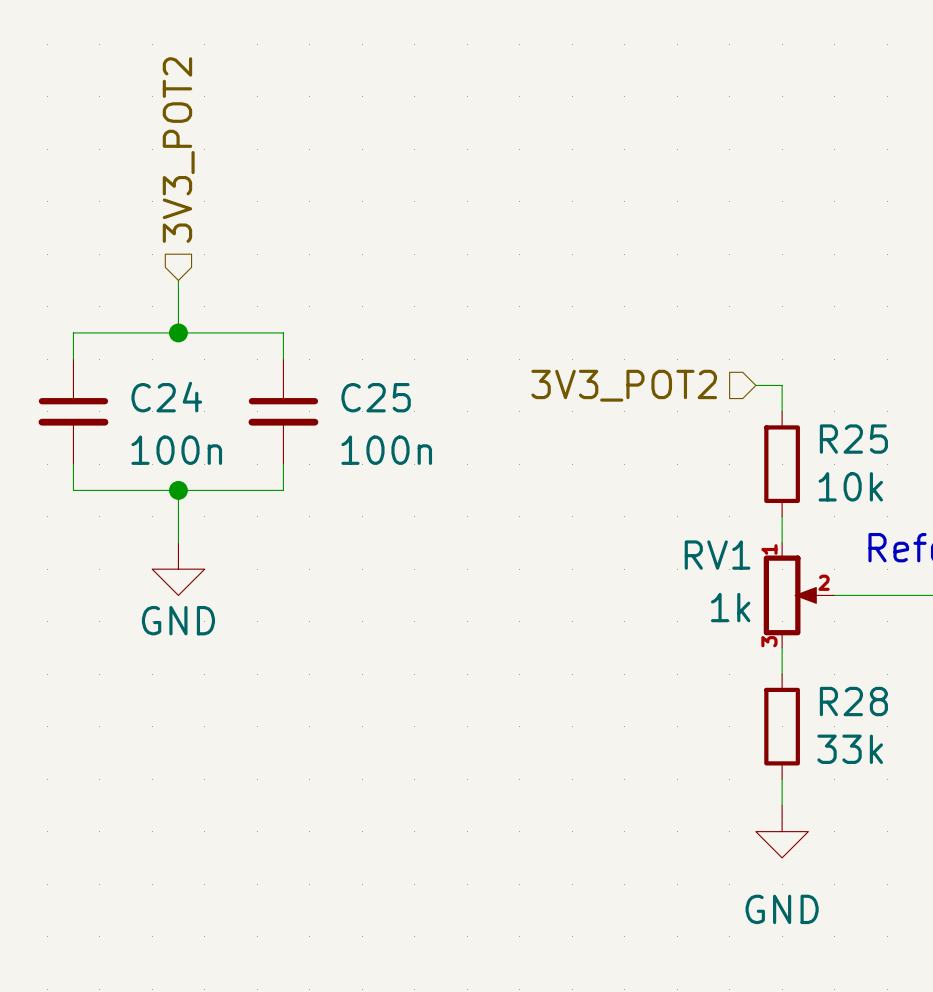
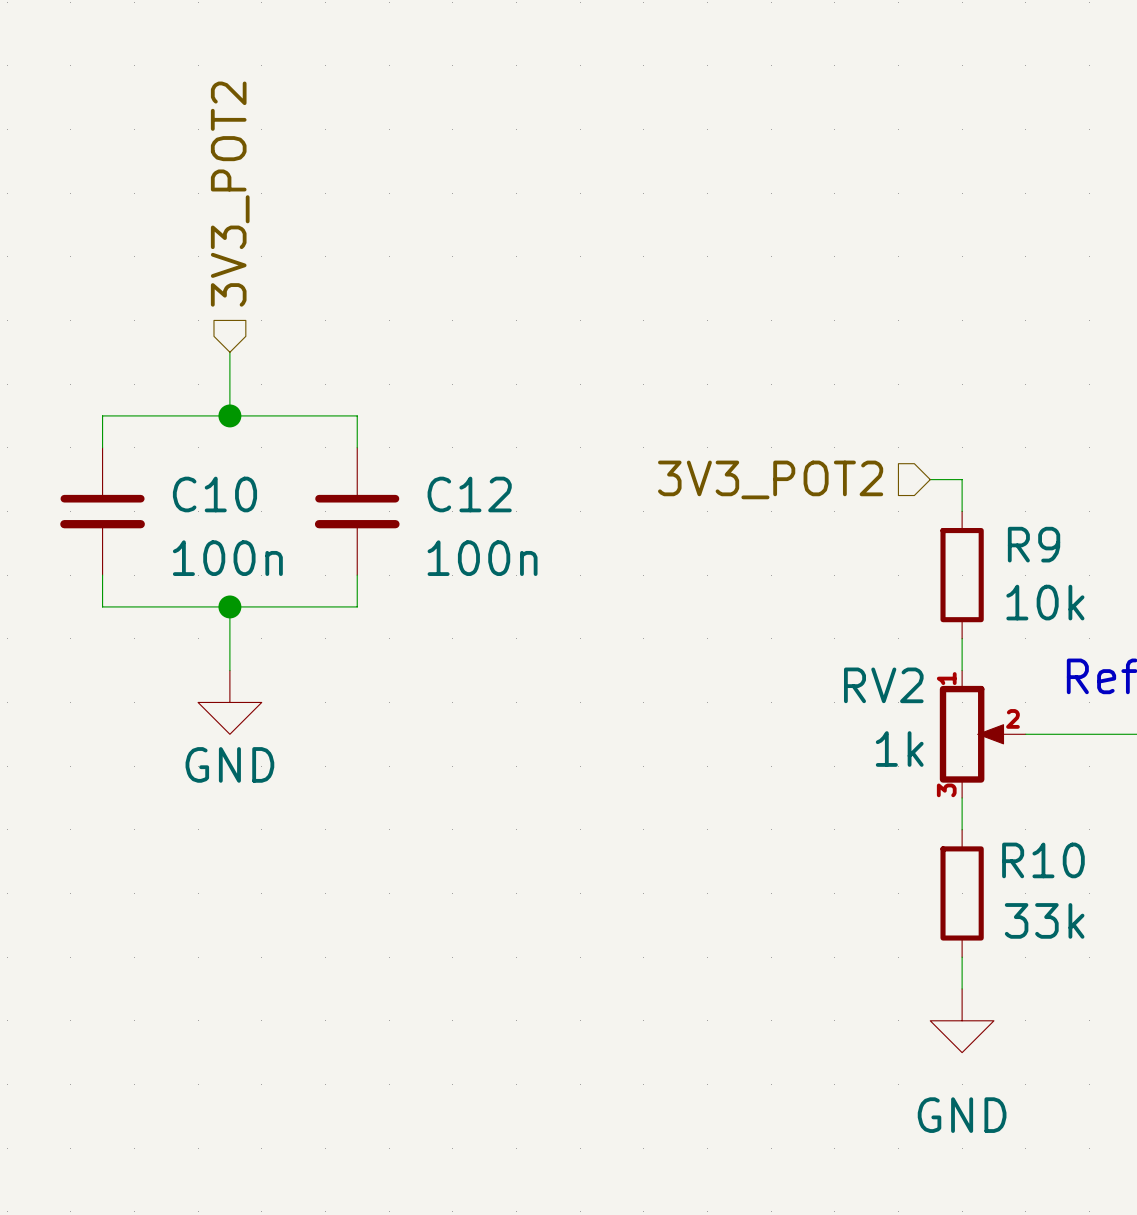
C24 name: C24 (166, 397) -> C10 (214, 494)
C25 name: C25 (376, 397) -> C12 (469, 494)
R25 name: R25 (853, 439) -> R9 (1034, 544)
RV1 name: RV1 (717, 555) -> RV2 (883, 685)
R28 name: R28 (853, 701) -> R10 (1043, 860)

